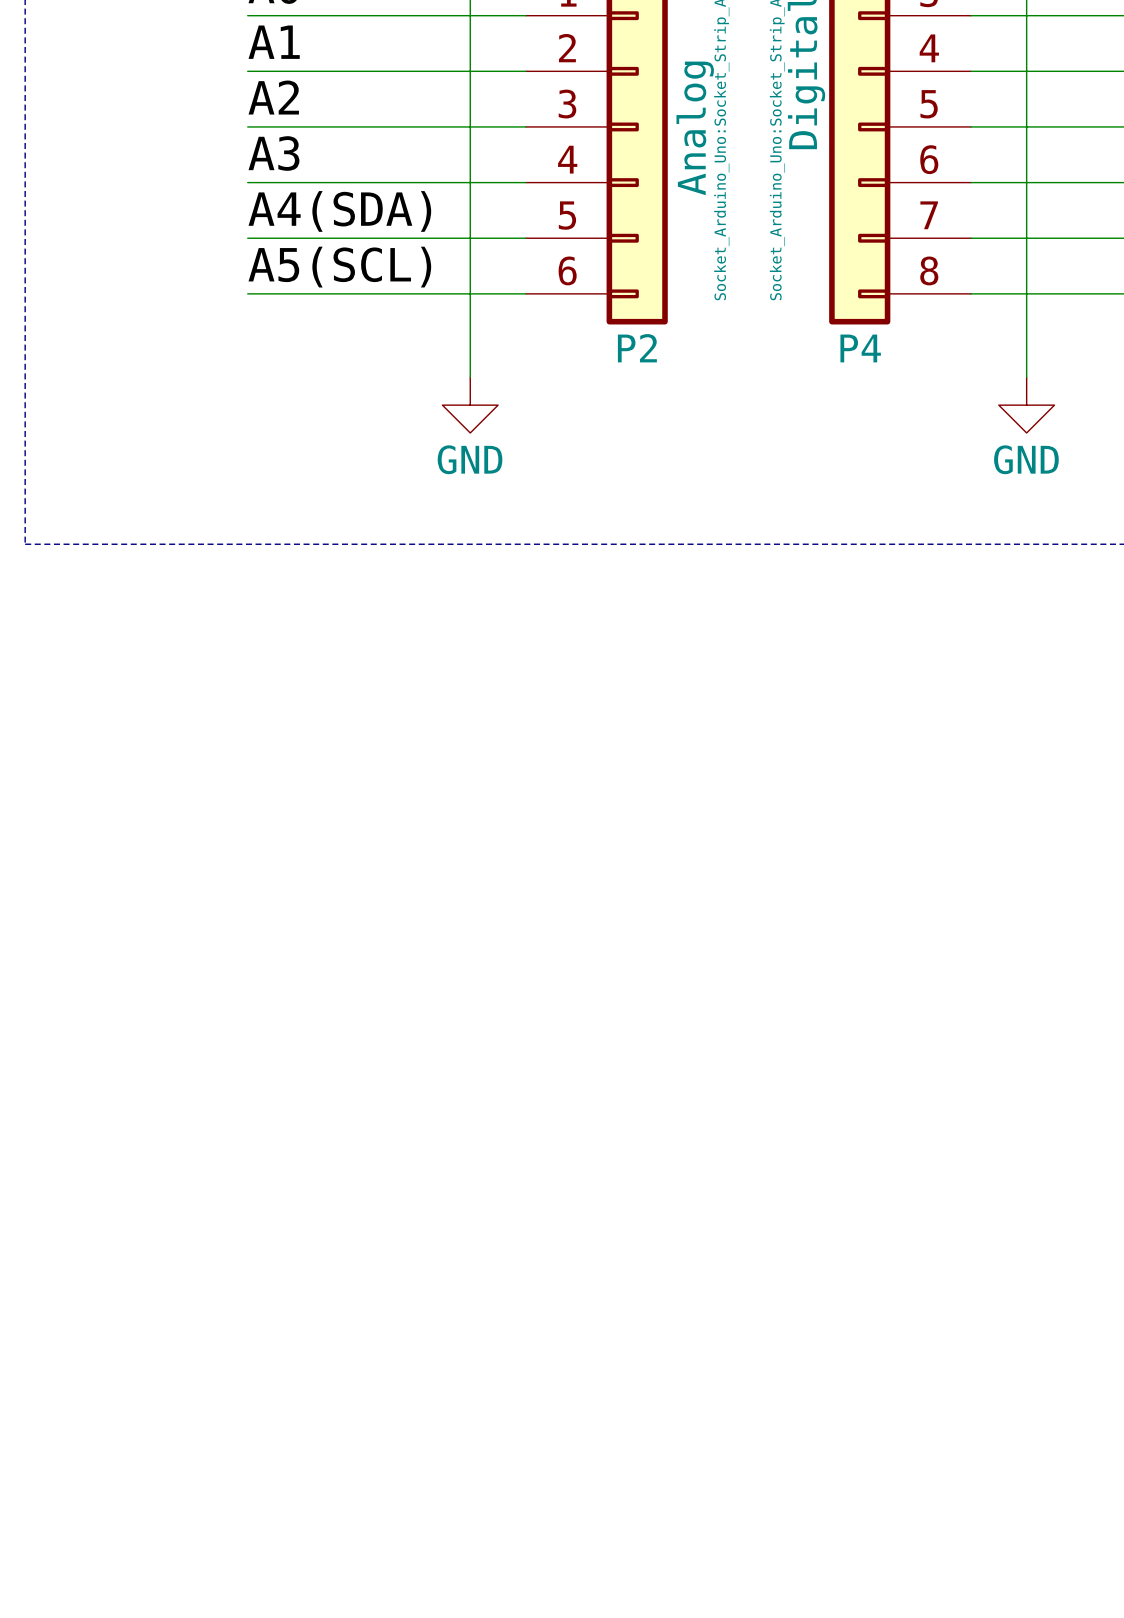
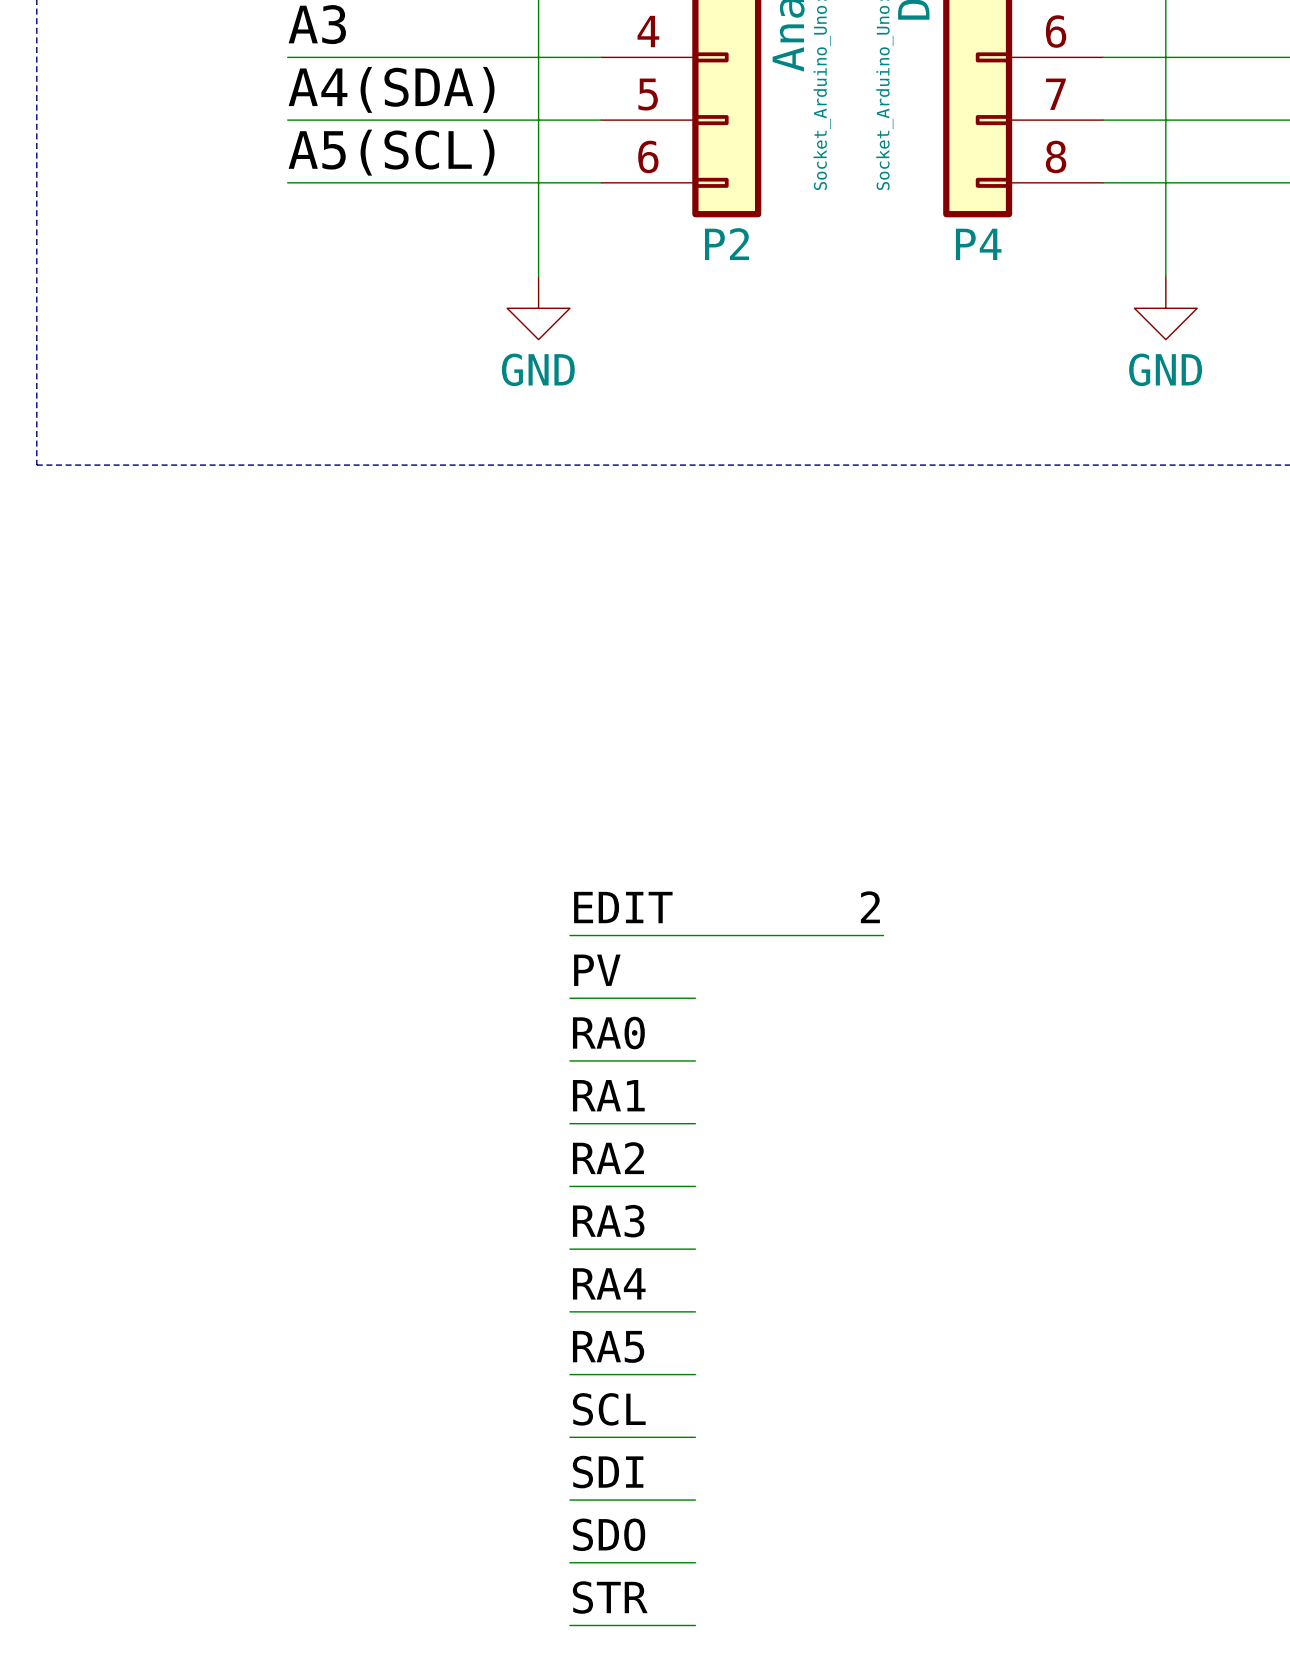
label: none -> EDIT (623, 907)
label: none -> 2 (870, 907)
wire: none -> (569, 935) (883, 935)
label: none -> PV (597, 970)
wire: none -> (569, 998) (695, 998)
label: none -> RA0 (608, 1033)
wire: none -> (569, 1060) (695, 1060)
label: none -> RA1 (608, 1095)
wire: none -> (569, 1123) (695, 1123)
label: none -> RA2 (608, 1158)
wire: none -> (569, 1186) (695, 1186)
label: none -> RA3 (608, 1221)
wire: none -> (569, 1249) (695, 1249)
label: none -> RA4 (609, 1283)
wire: none -> (569, 1311) (695, 1311)
label: none -> RA5 (608, 1346)
wire: none -> (569, 1374) (695, 1374)
label: none -> SCL (609, 1409)
wire: none -> (569, 1437) (695, 1437)
label: none -> SDI (608, 1472)
wire: none -> (569, 1500) (695, 1500)
label: none -> SDO (609, 1534)
wire: none -> (569, 1562) (695, 1562)
label: none -> STR (610, 1597)
wire: none -> (569, 1625) (695, 1625)

